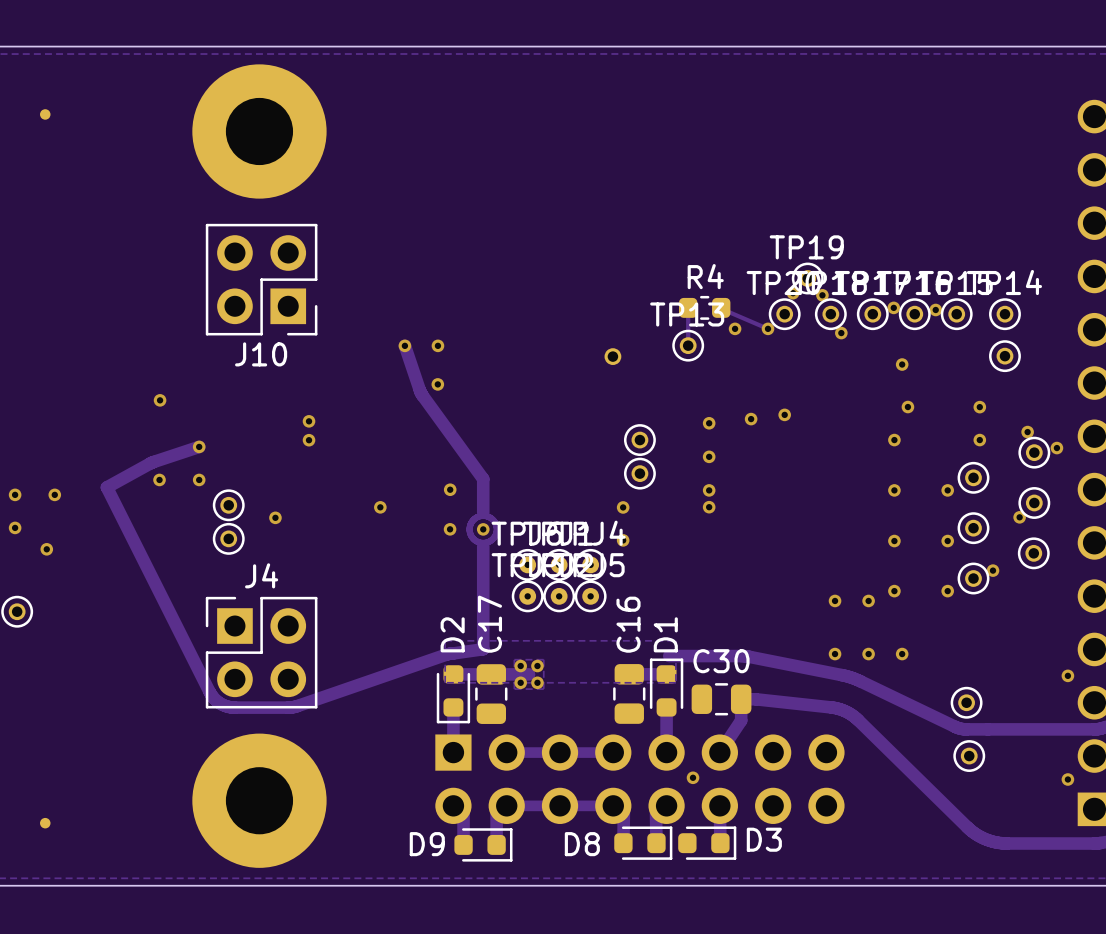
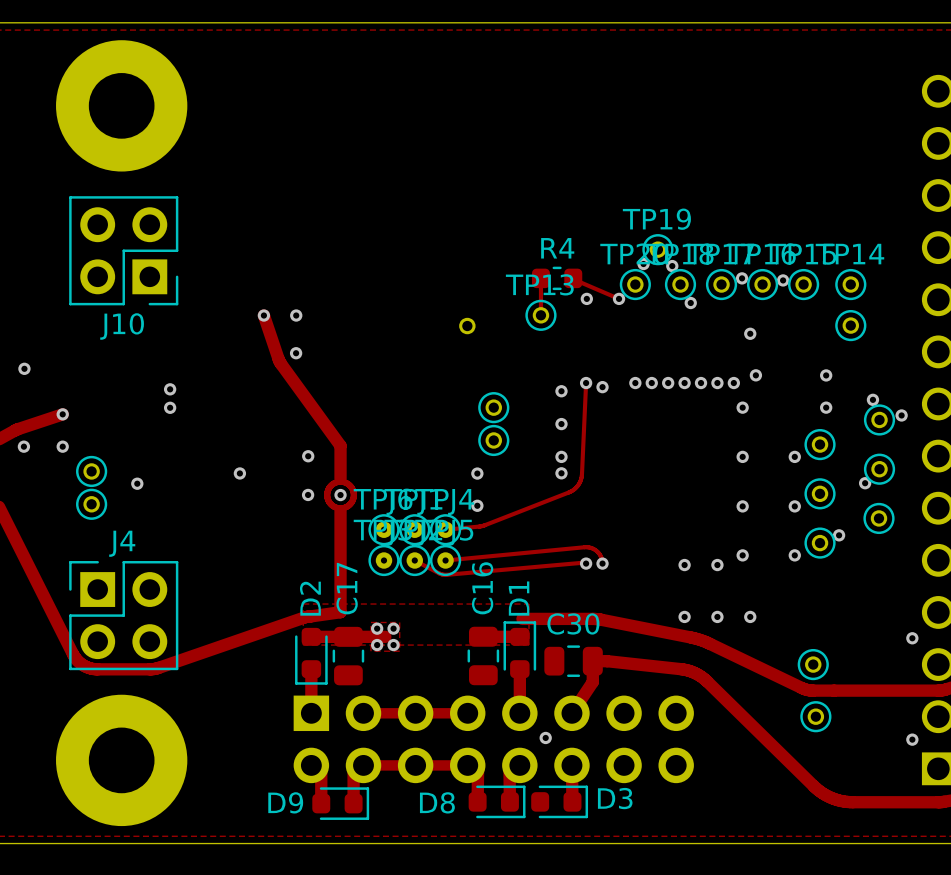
track: none -> (586, 383) (581, 476) (576, 487) (568, 492) (483, 525) (445, 529)
via: none -> (586, 383)
via: none -> (651, 383)
via: none -> (668, 383)
via: none -> (684, 383)
via: none -> (701, 383)
via: none -> (717, 383)
via: none -> (733, 383)
track: none -> (414, 560) (445, 574) (585, 562)
track: none -> (445, 560) (586, 547) (597, 552) (602, 563)
via: none -> (586, 563)
via: none -> (602, 563)

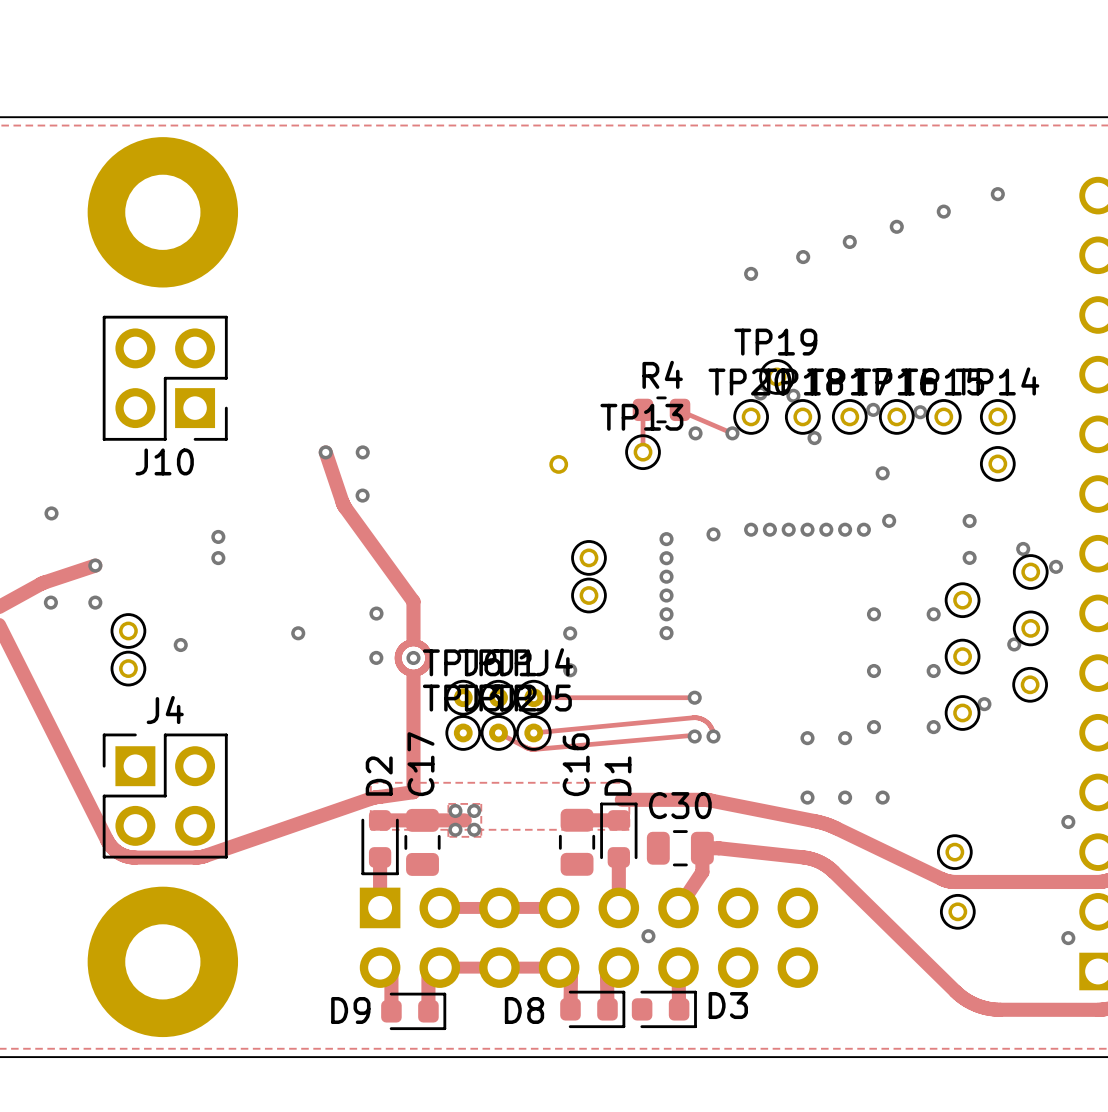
via: none -> (997, 194)
via: none -> (943, 211)
via: none -> (896, 226)
via: none -> (849, 241)
via: none -> (803, 257)
via: none -> (751, 273)
track: (586, 383) (581, 476) (576, 487) (568, 492) (483, 525) (445, 529) -> (694, 697) (533, 697)
via: (586, 383) -> none
via: none -> (666, 558)
via: (742, 407) -> none
via: none -> (666, 595)
via: none -> (694, 697)

